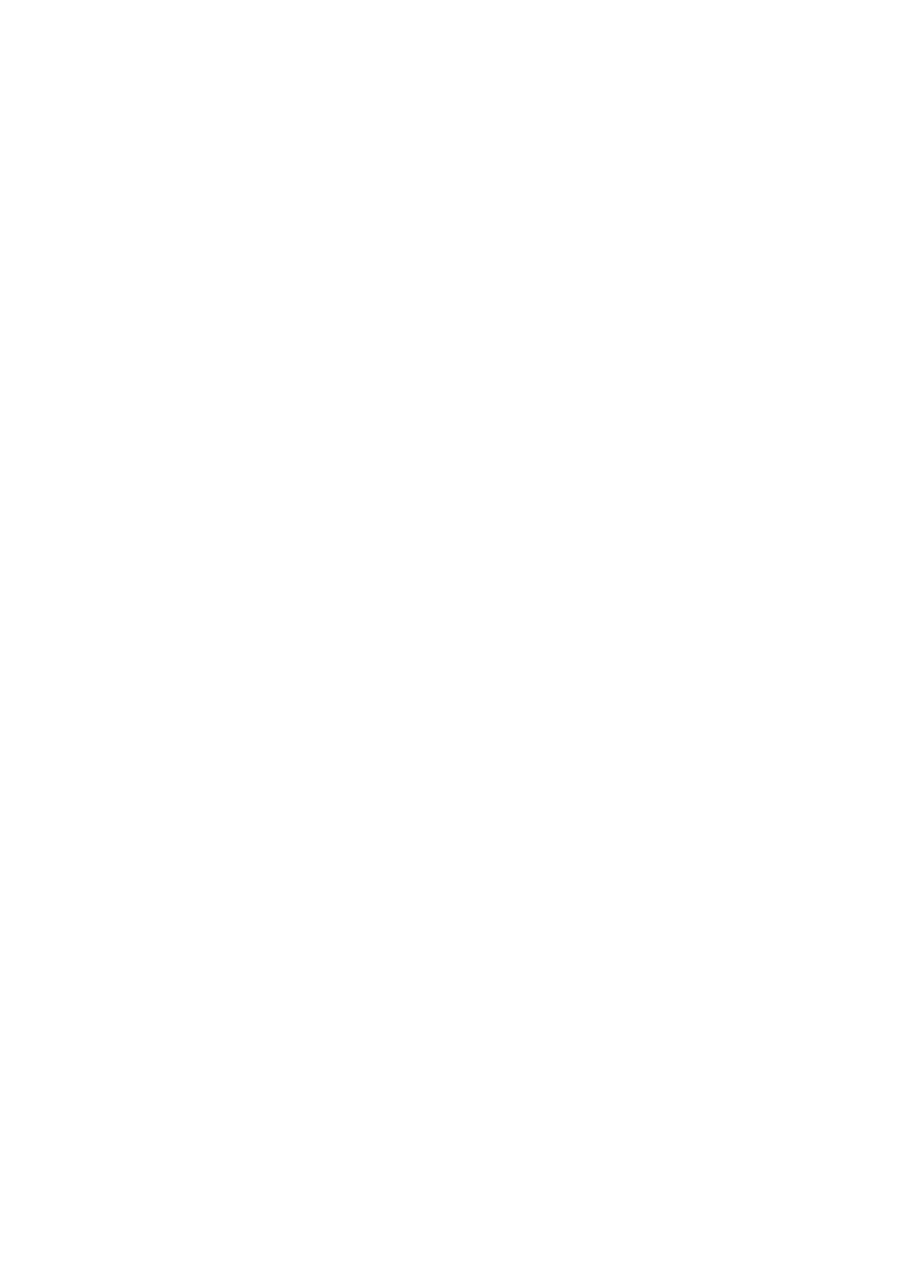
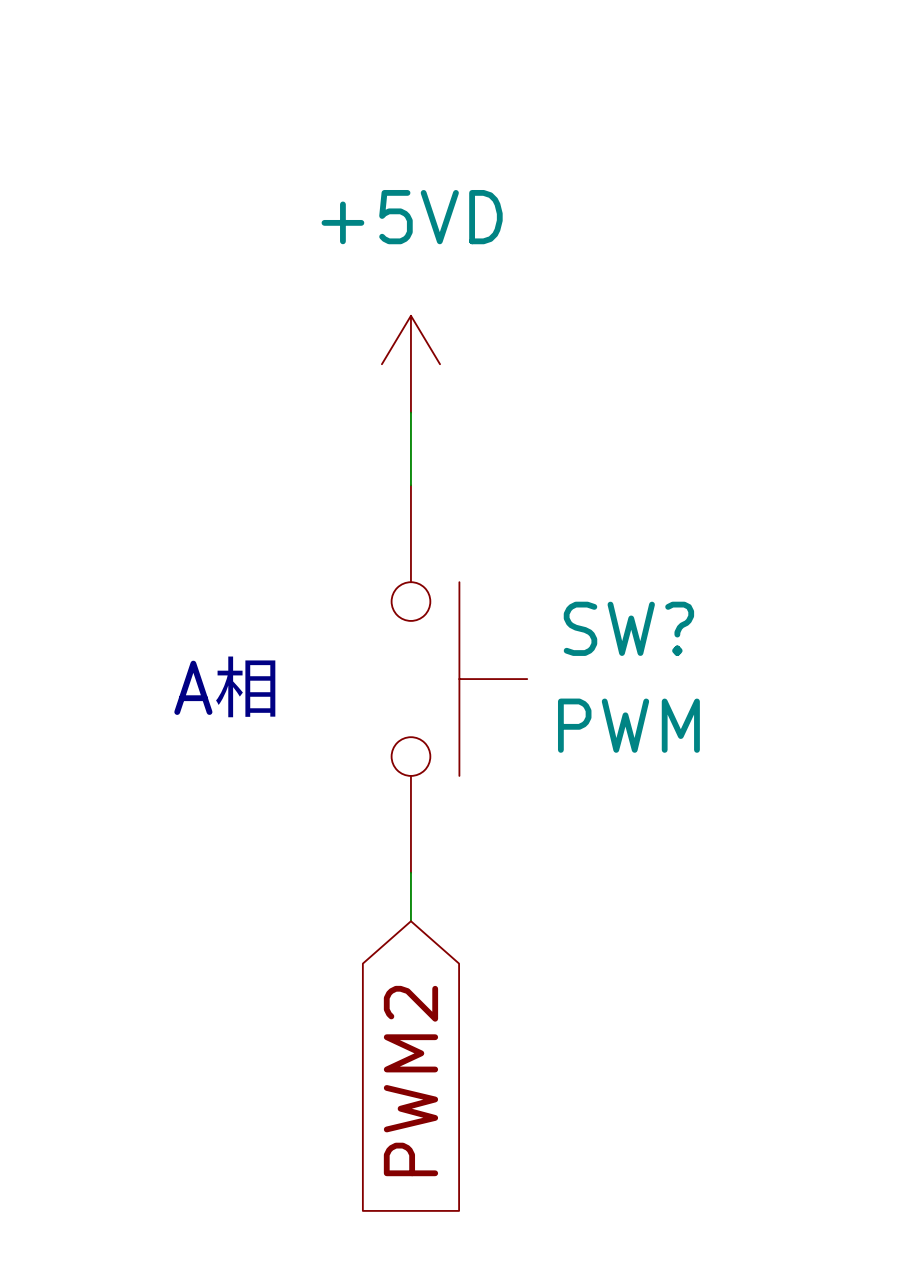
power symbol: none -> +5VD (410, 364)
wire: none -> (410, 412) (410, 485)
SW?: none -> PWM (459, 679)
text: none -> A相 (226, 686)
wire: none -> (410, 872) (410, 921)
global label: none -> PWM2 (410, 1081)

